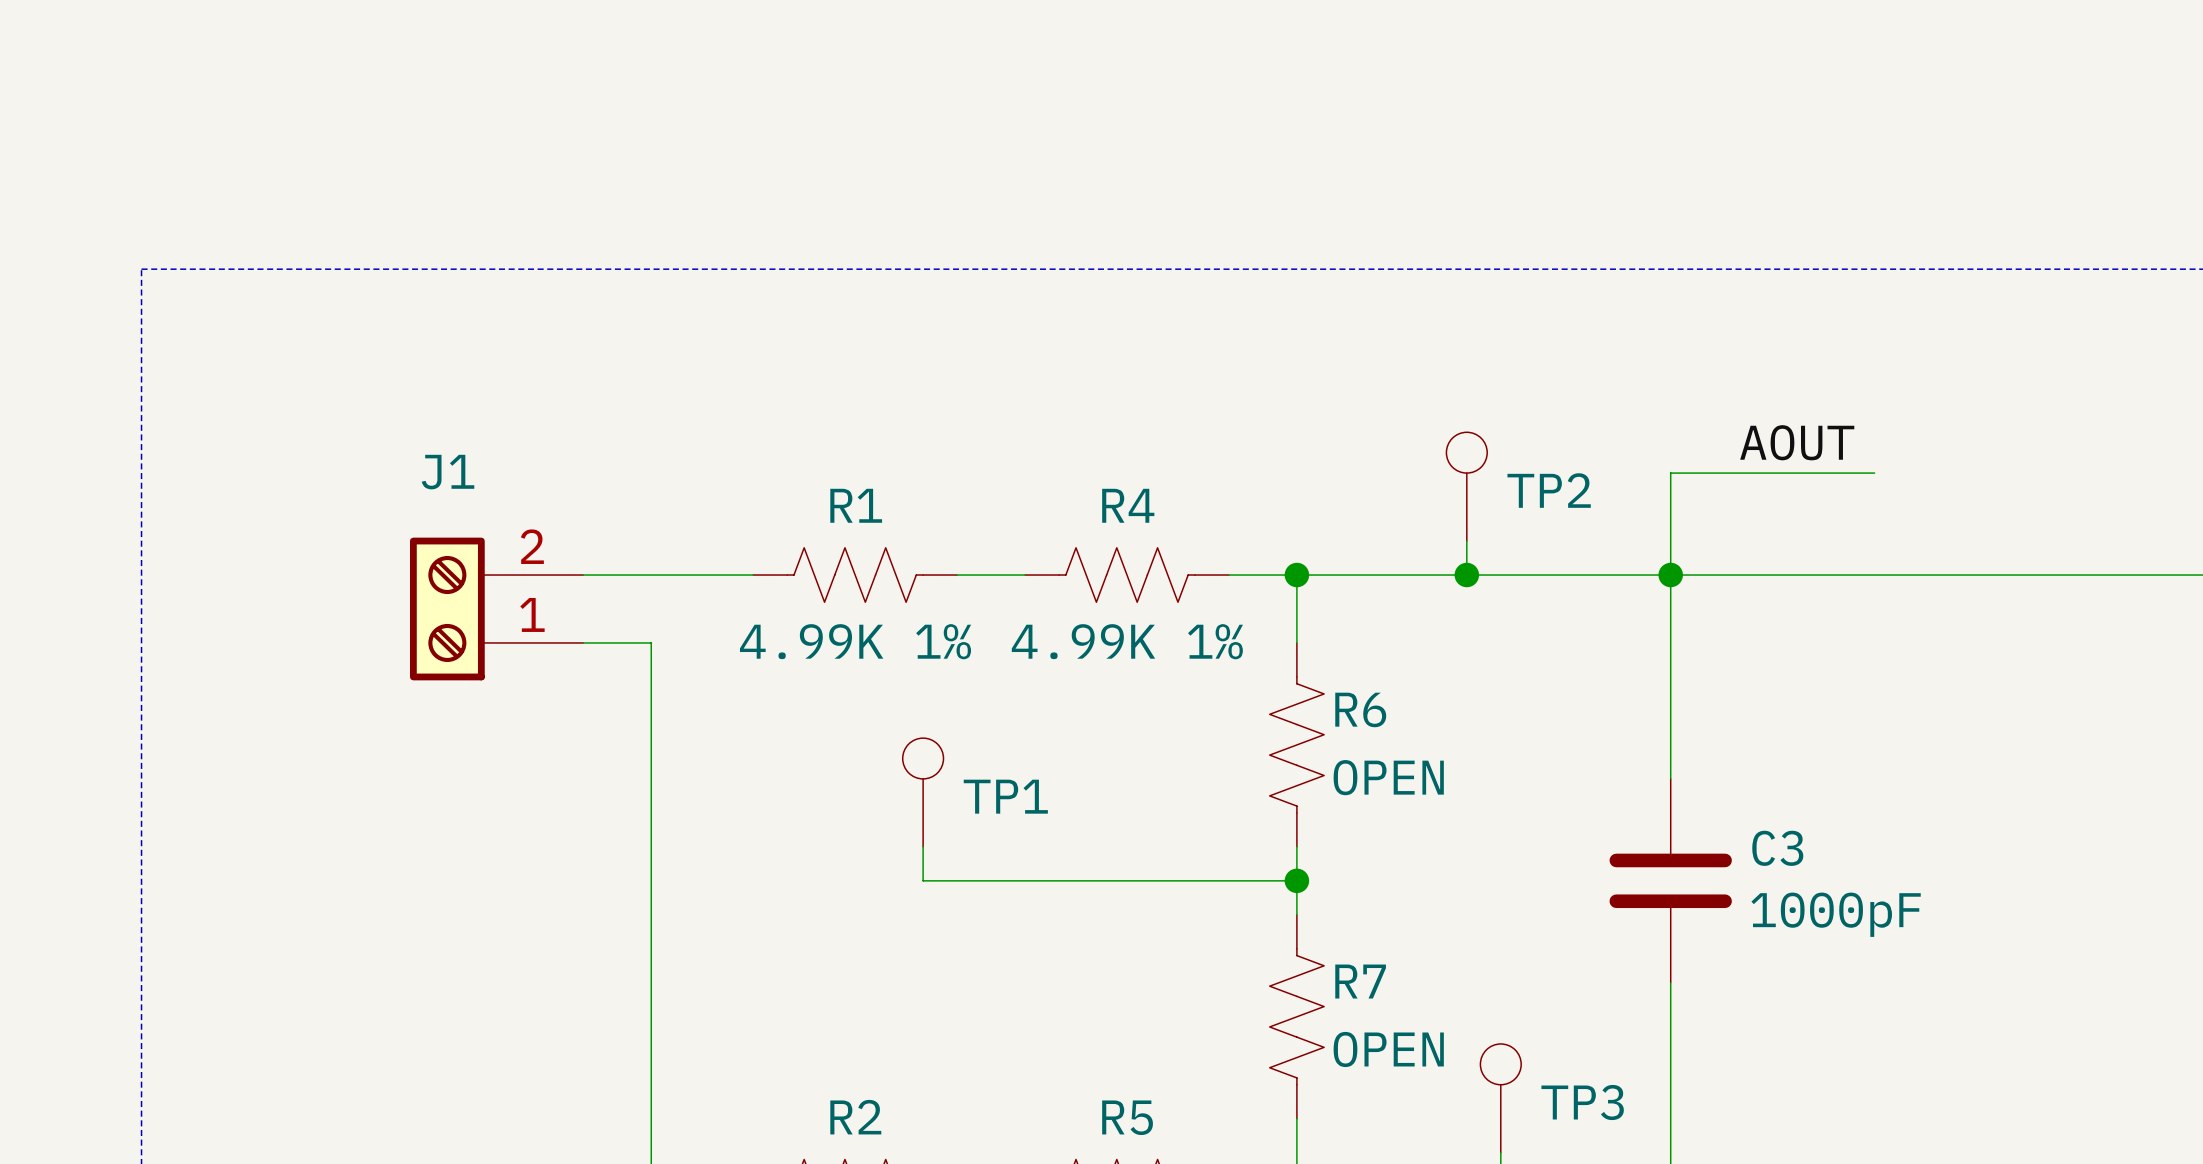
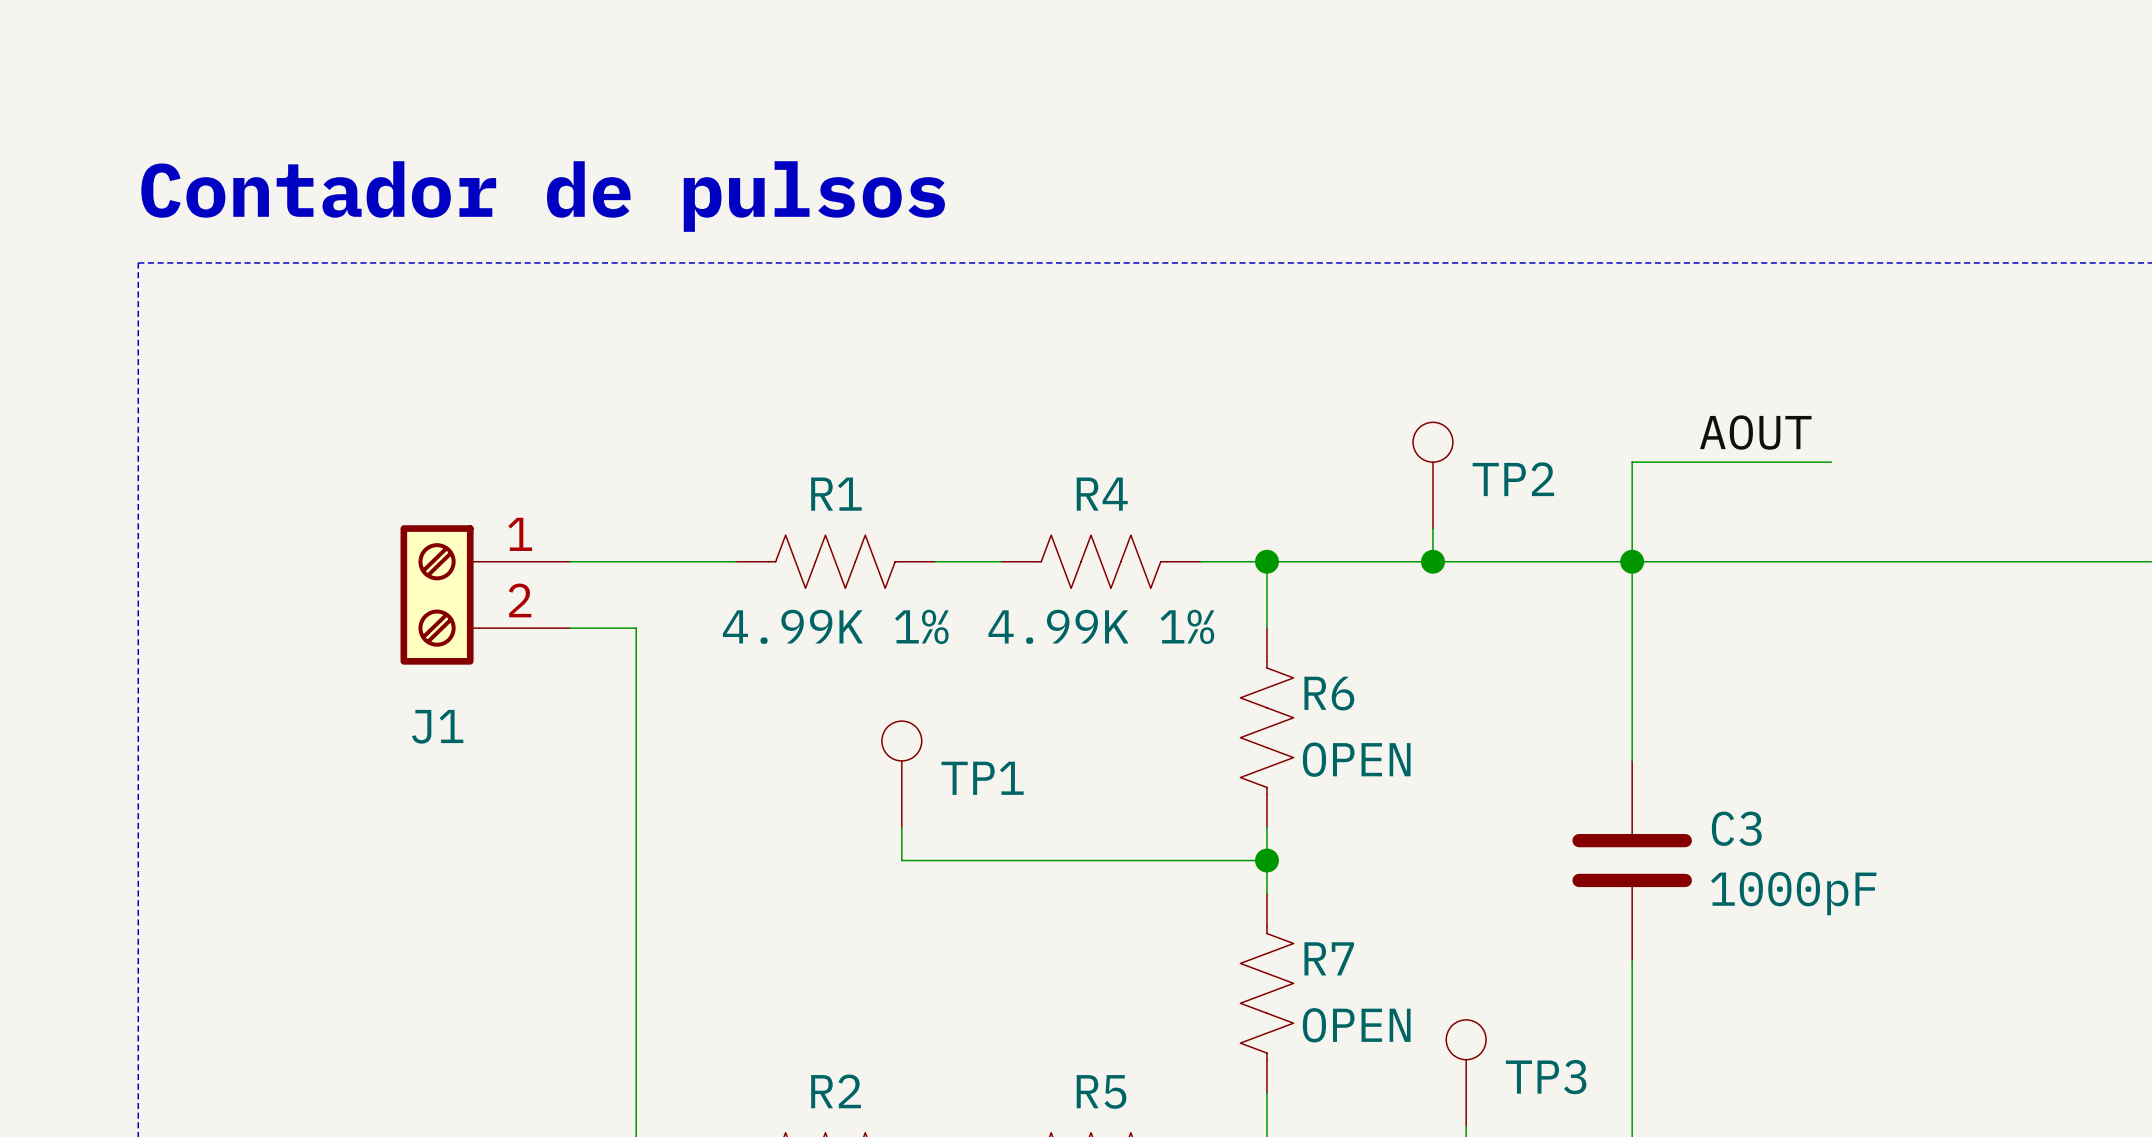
text: none -> Contador de pulsos (543, 196)
J1 flip: as is (447, 608) -> up-down (437, 594)

